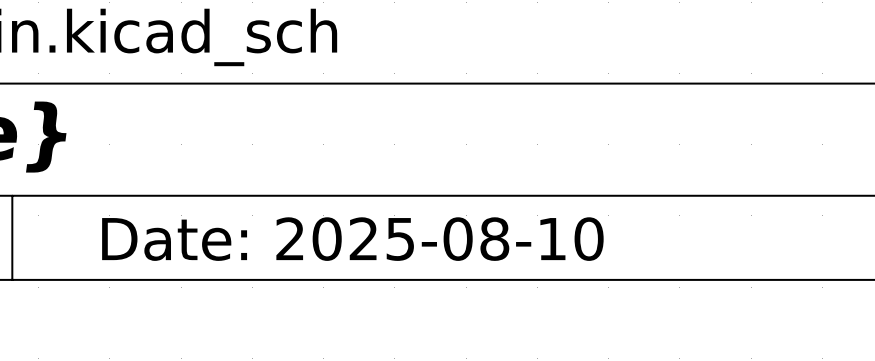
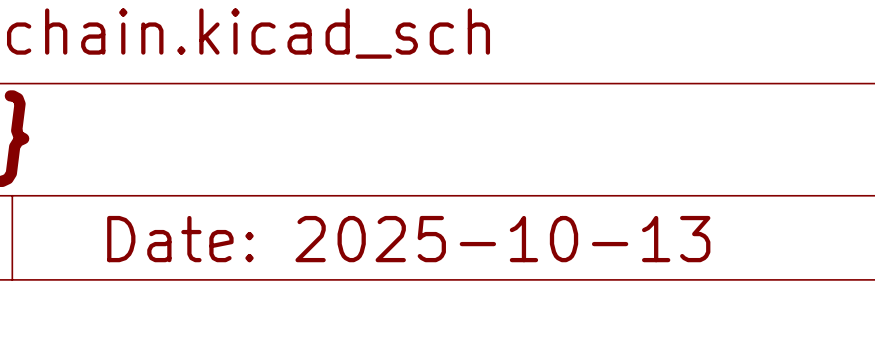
title block: Date: 2025-08-10 (352, 239) -> Date: 2025-10-13 (408, 239)

